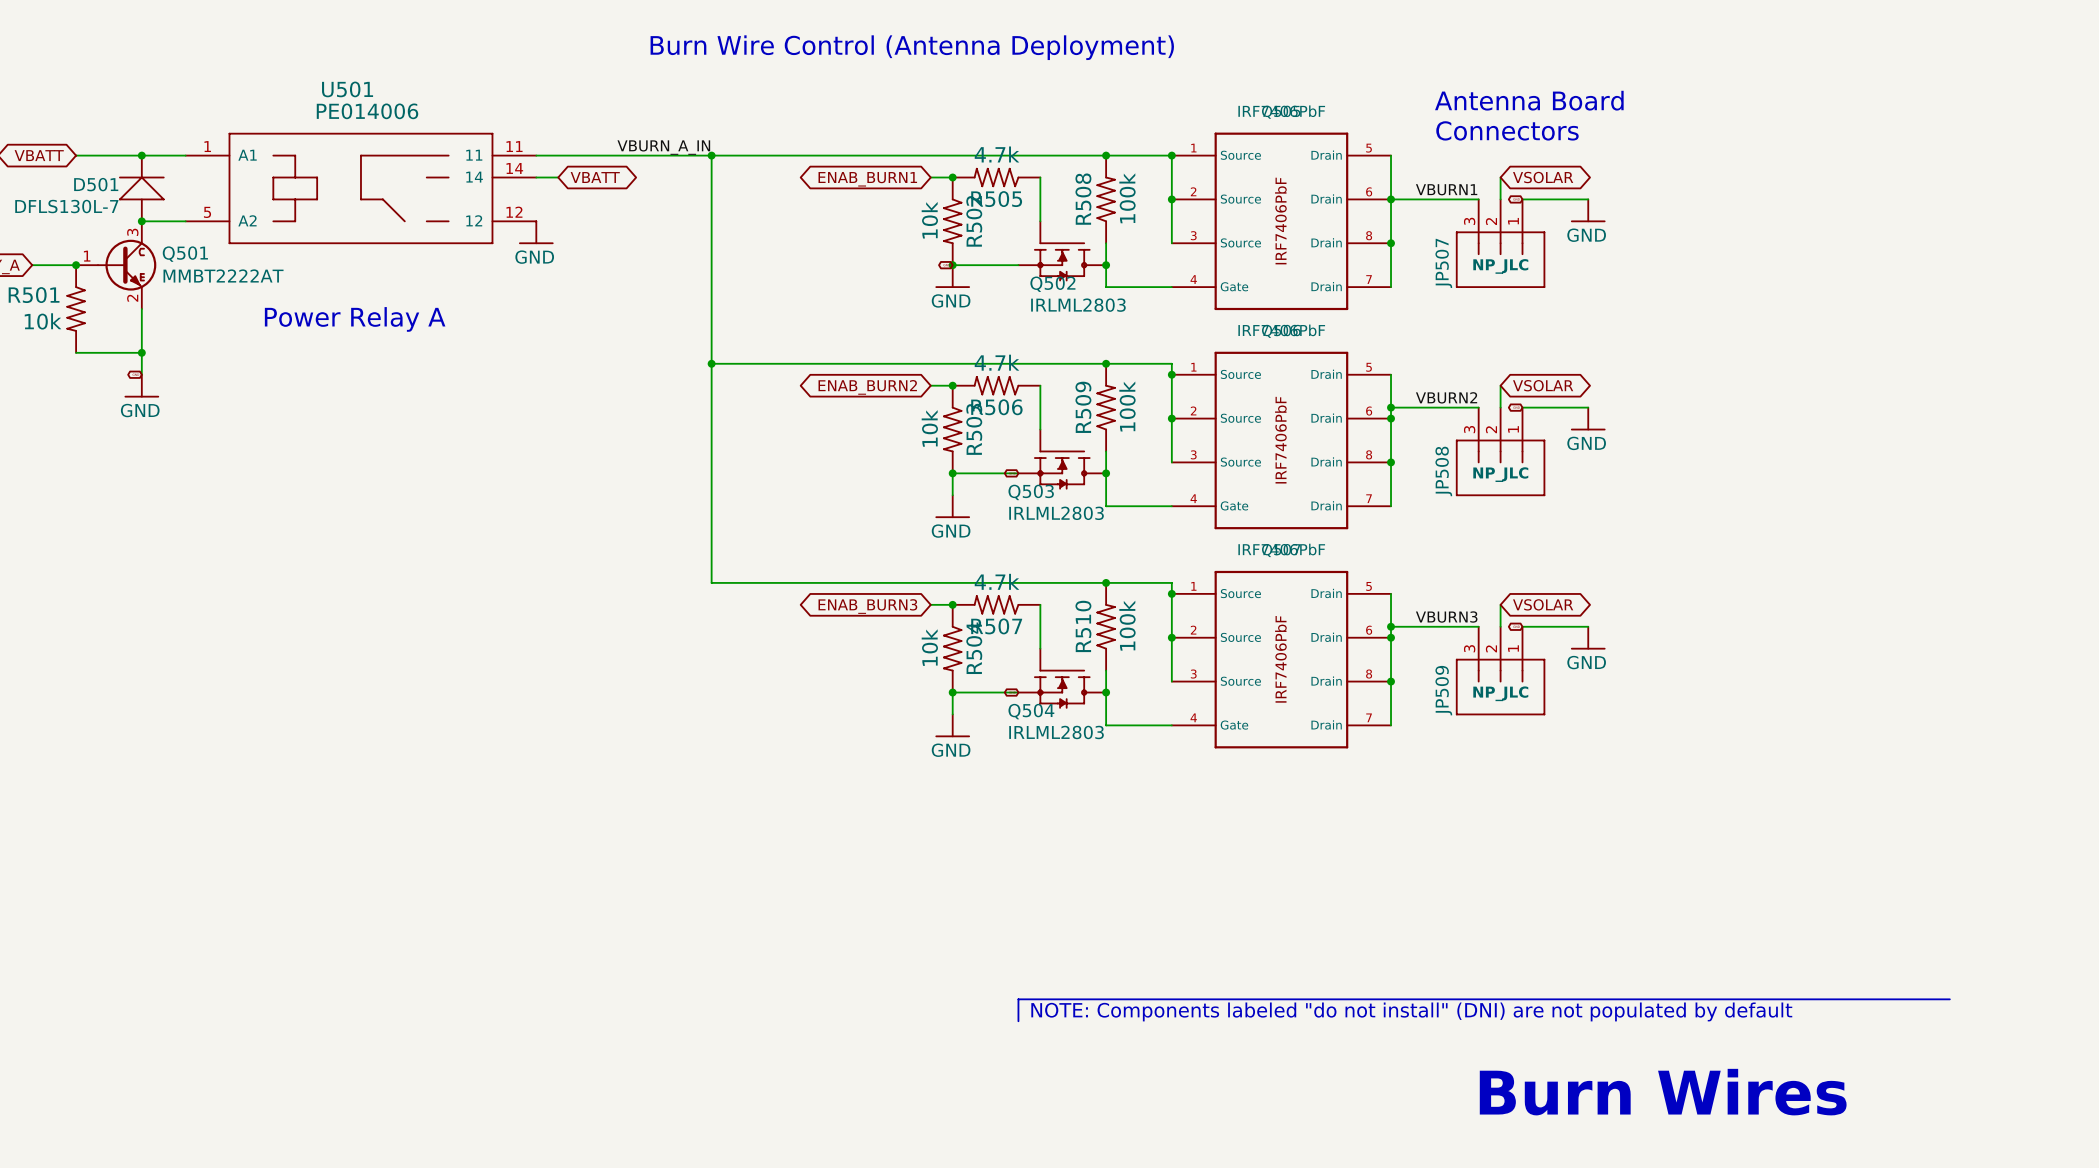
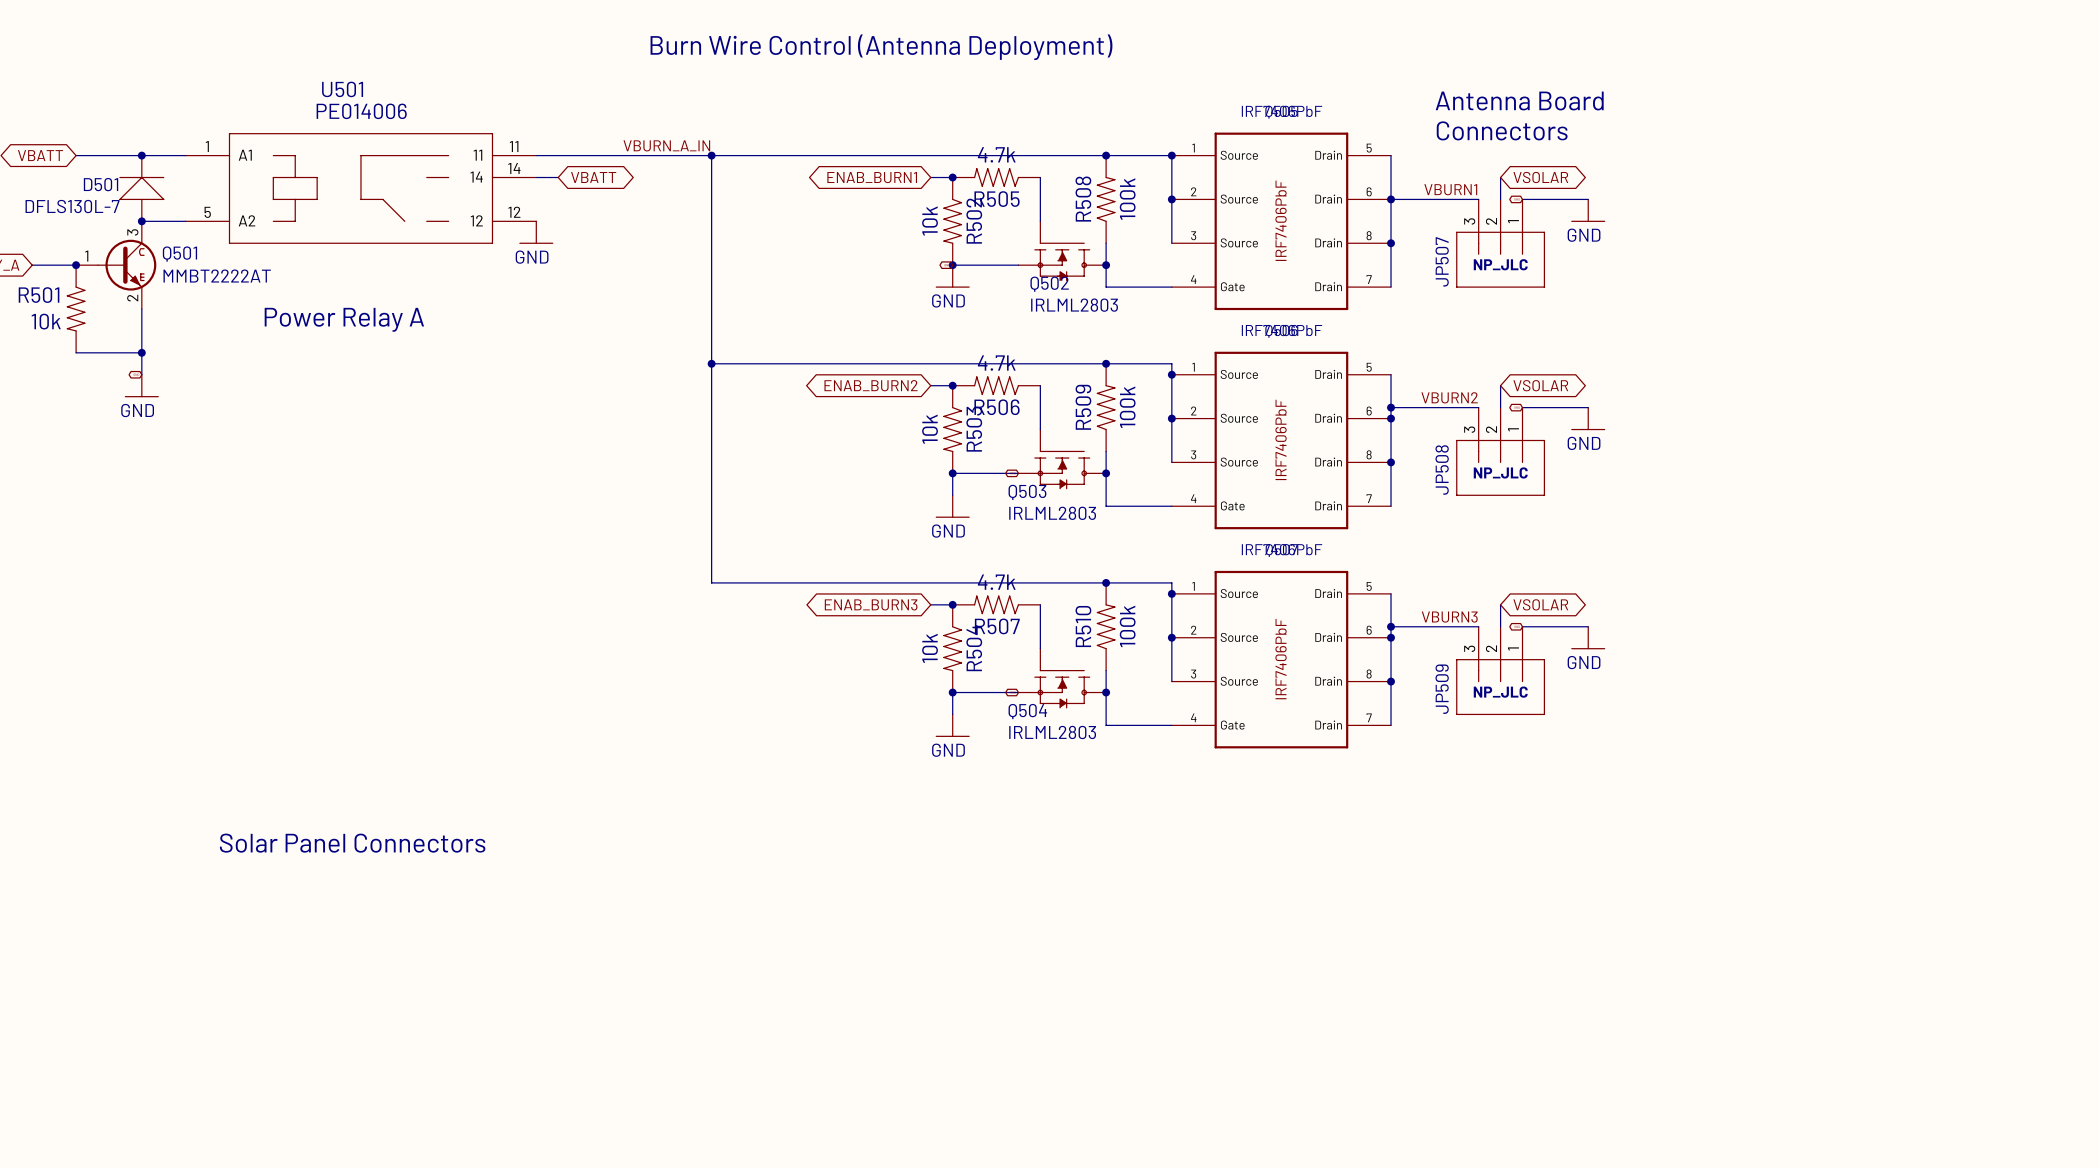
text: none -> Solar Panel Connectors (352, 843)
line: (1949, 999) (1018, 999) (1018, 1021) -> none
text: NOTE: Components labeled "do not install" (DNI) are not populated by default (1411, 1011) -> none
text: Burn Wires (1663, 1092) -> none

